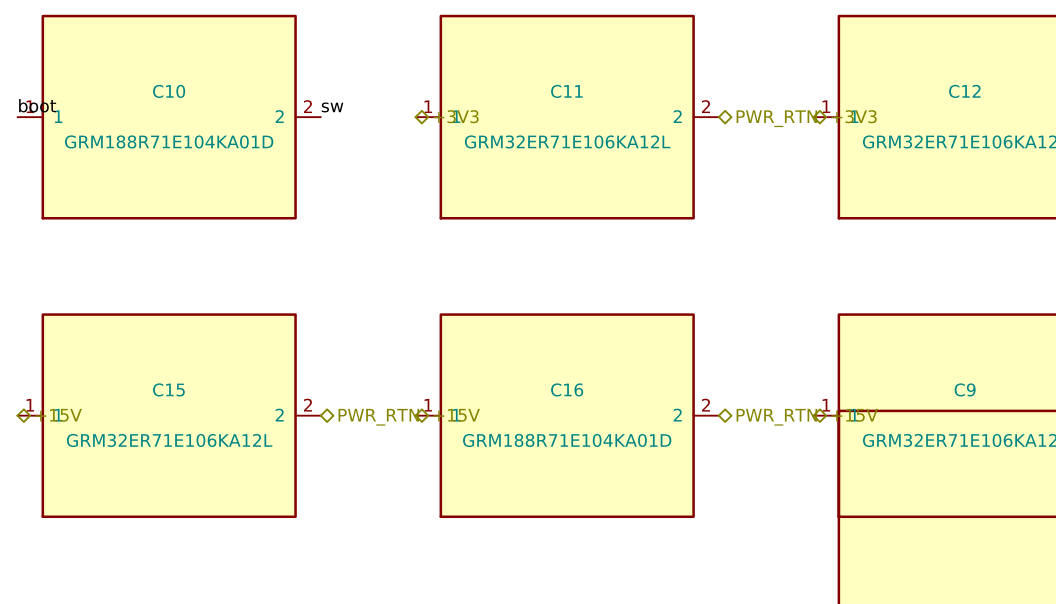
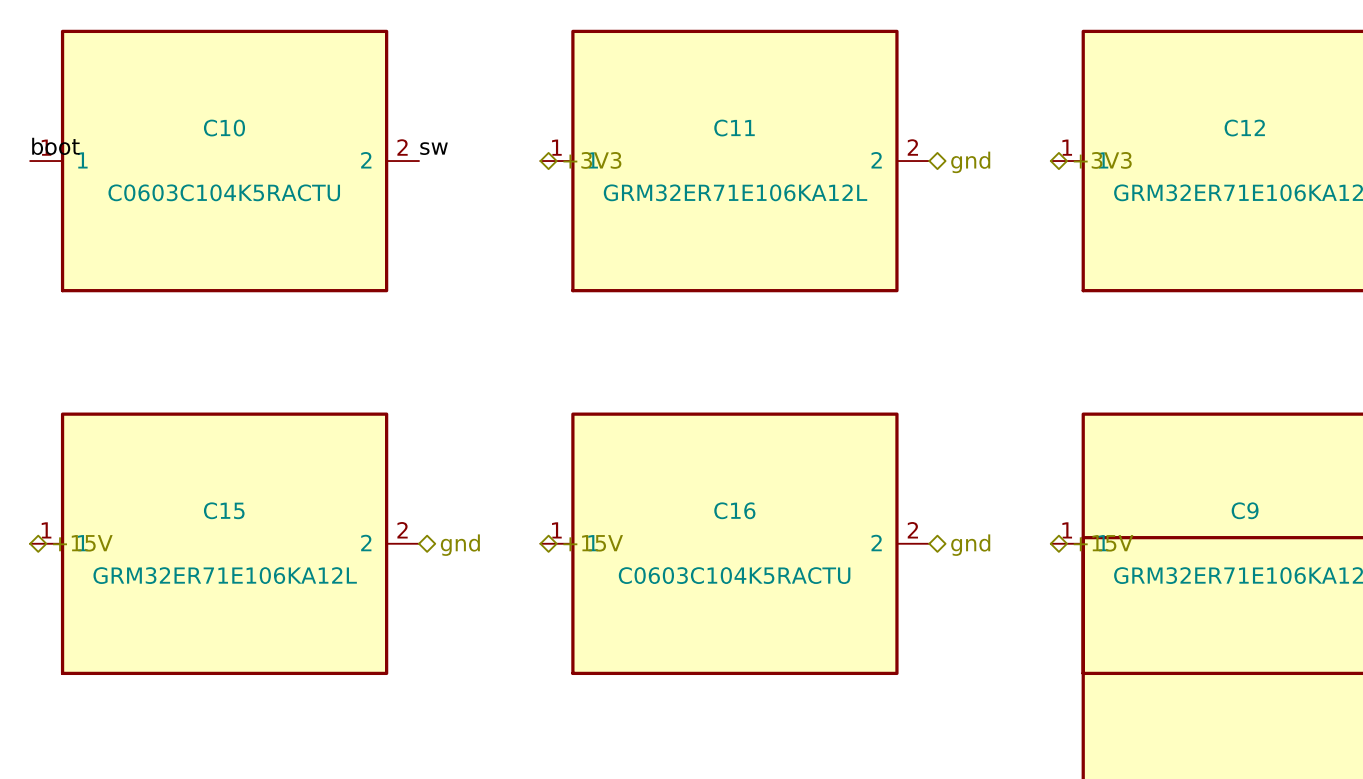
hierarchical label: PWR_RTN (776, 118) -> gnd (970, 162)
C10 value: GRM188R71E104KA01D (169, 141) -> C0603C104K5RACTU (224, 192)
hierarchical label: PWR_RTN (378, 417) -> gnd (460, 545)
hierarchical label: PWR_RTN (776, 417) -> gnd (970, 545)
C16 value: GRM188R71E104KA01D (567, 440) -> C0603C104K5RACTU (734, 575)

